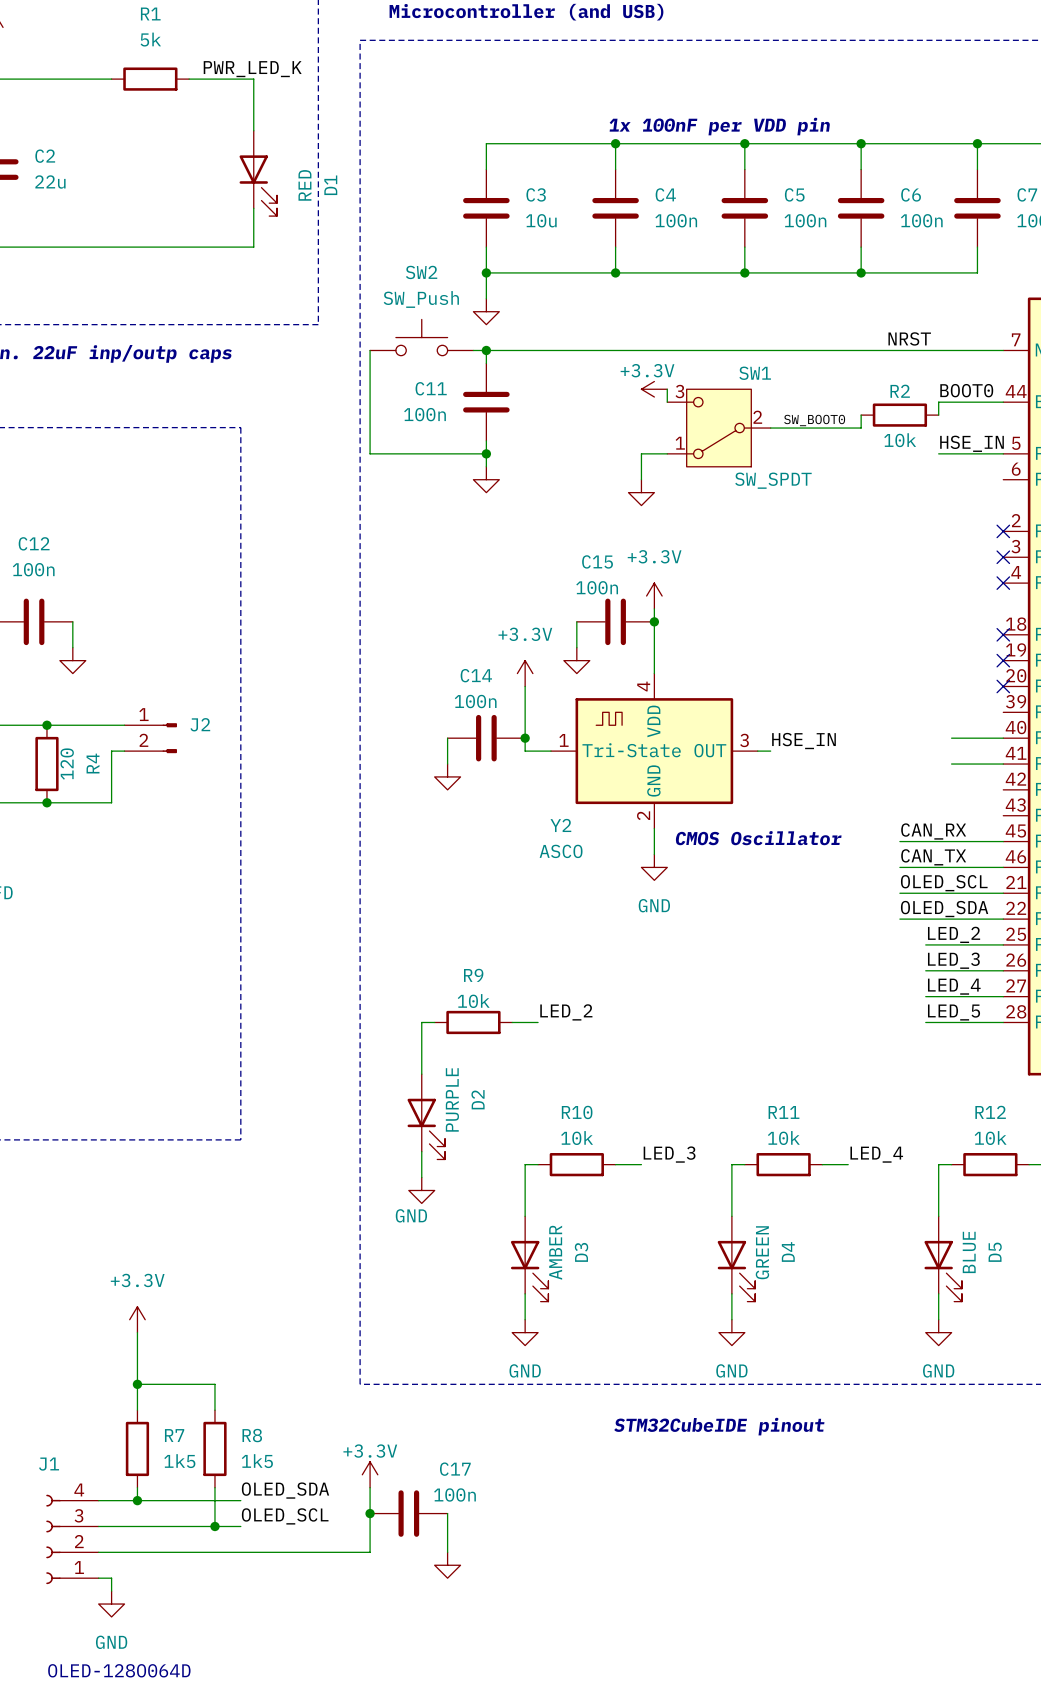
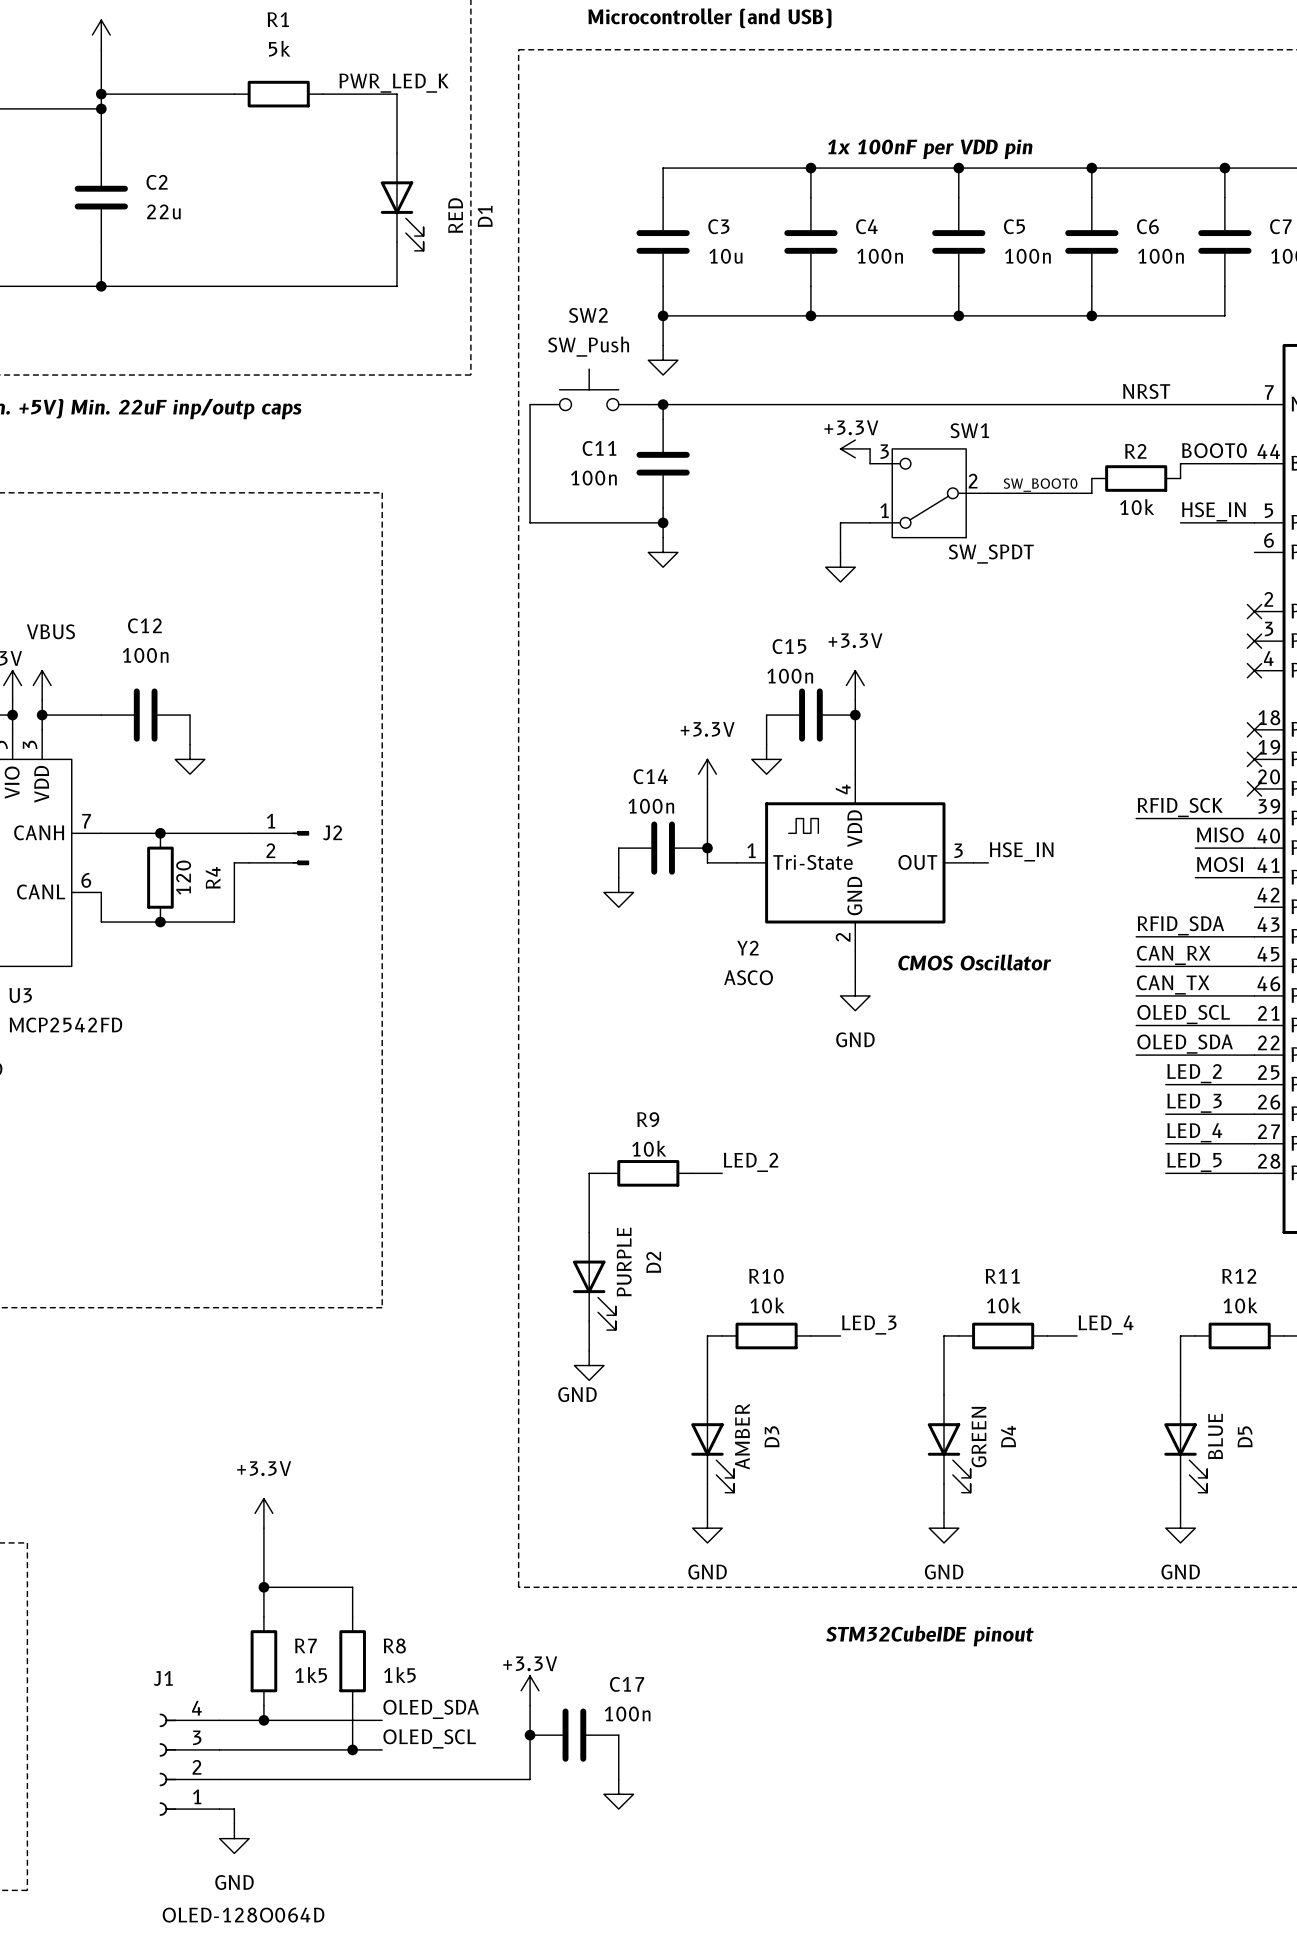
label: none -> RFID_SCK (1180, 807)
wire: none -> (1136, 818) (1254, 818)
label: none -> MISO (1220, 834)
label: none -> MOSI (1219, 864)
label: none -> RFID_SDA (1180, 925)
wire: none -> (1136, 936) (1254, 936)

